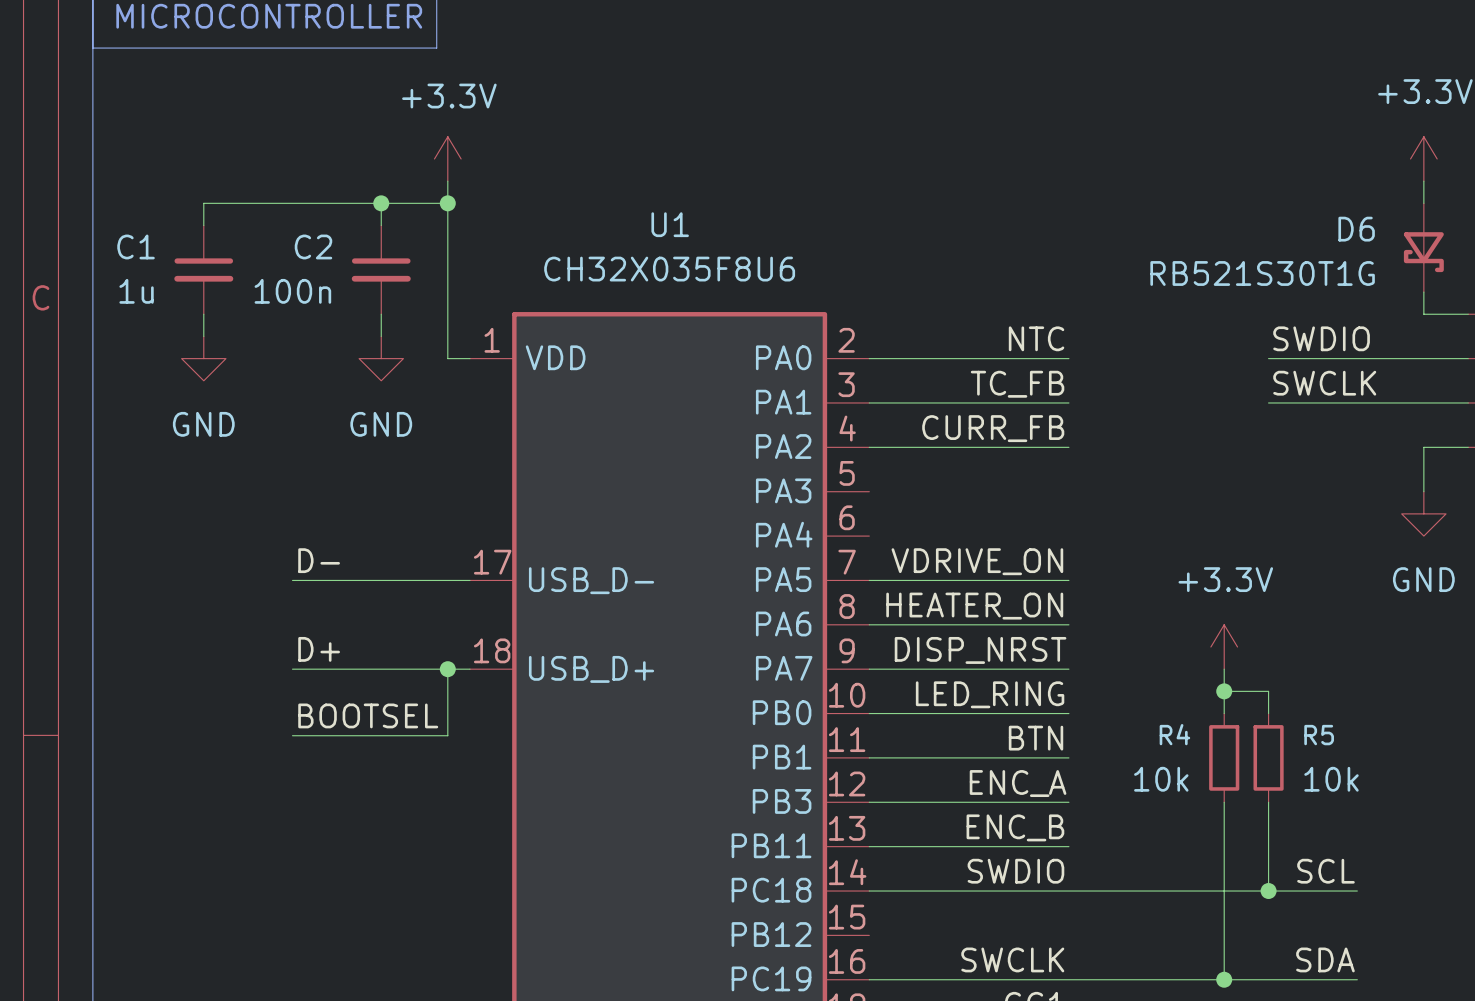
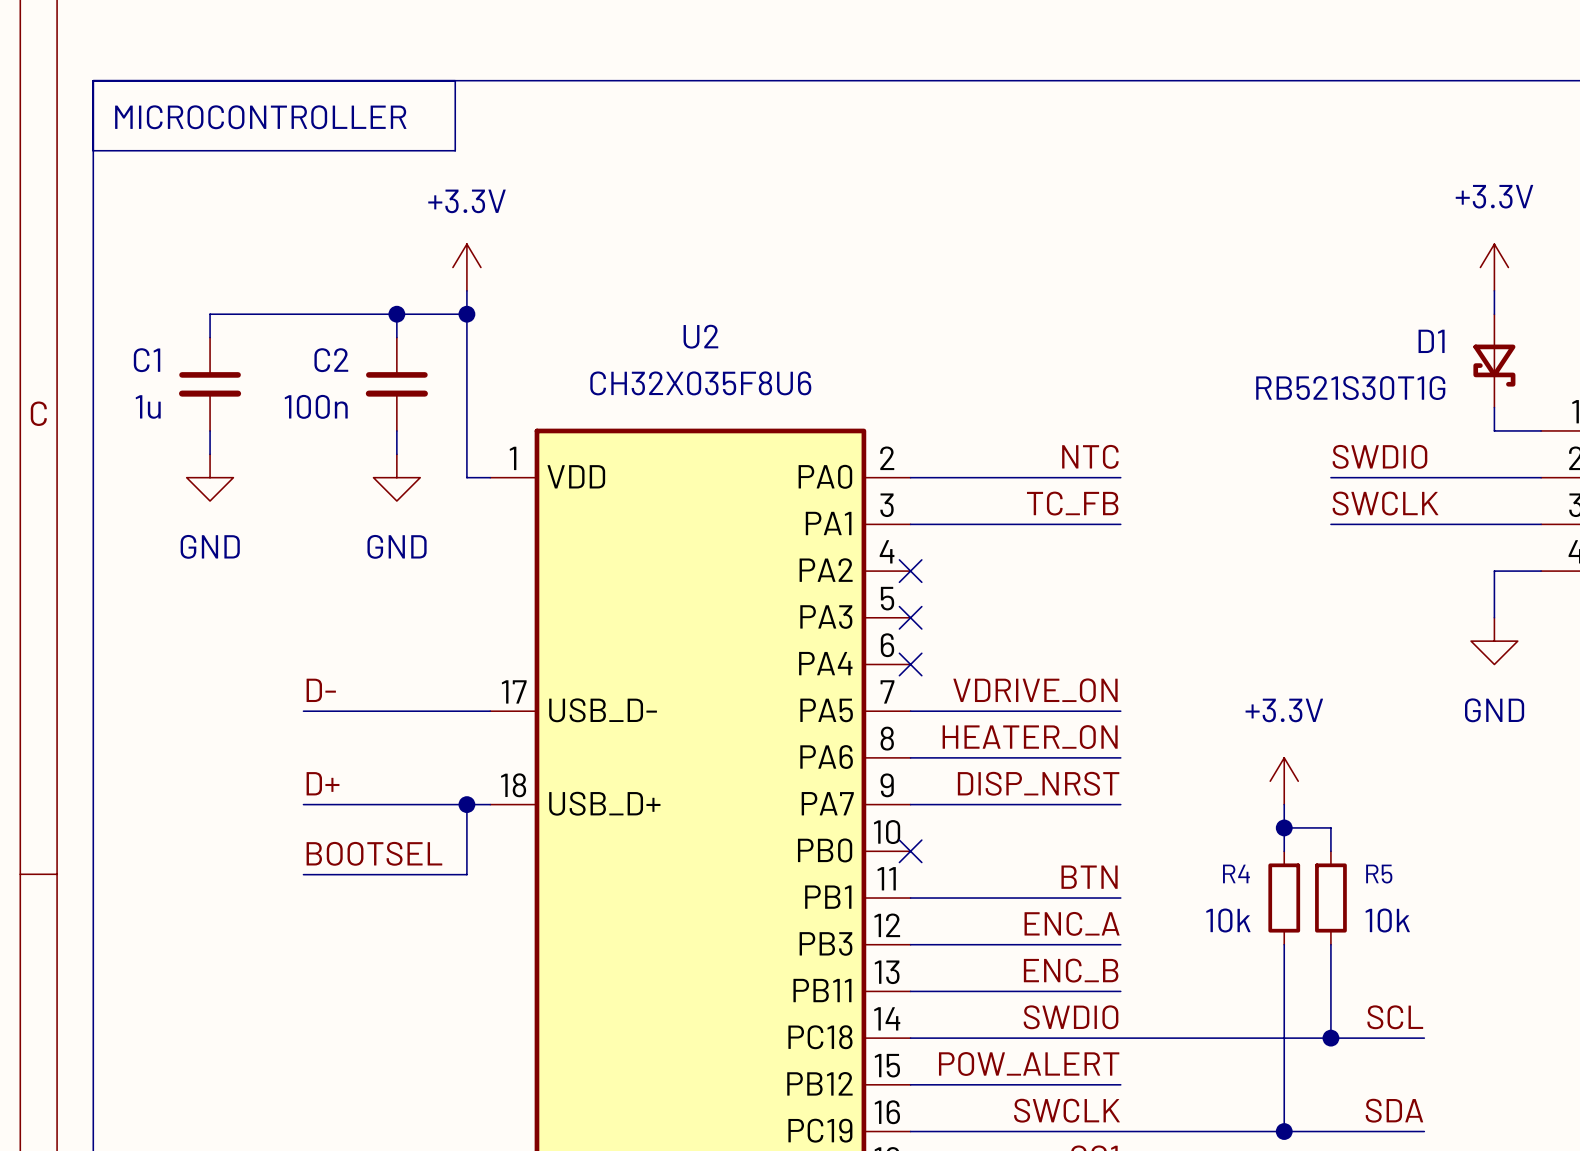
U1 name: U1 (670, 224) -> U2 (700, 336)
D6 name: D6 (1356, 229) -> D1 (1431, 341)
label: CURR_FB (993, 428) -> none
wire: (869, 447) (1068, 447) -> none
no-connect mark: none -> (910, 571)
no-connect mark: none -> (910, 617)
no-connect mark: none -> (910, 664)
label: LED_RING (990, 694) -> none
wire: (869, 713) (1068, 713) -> (910, 1084) (1120, 1084)
no-connect mark: none -> (910, 851)
label: none -> POW_ALERT (1029, 1063)

